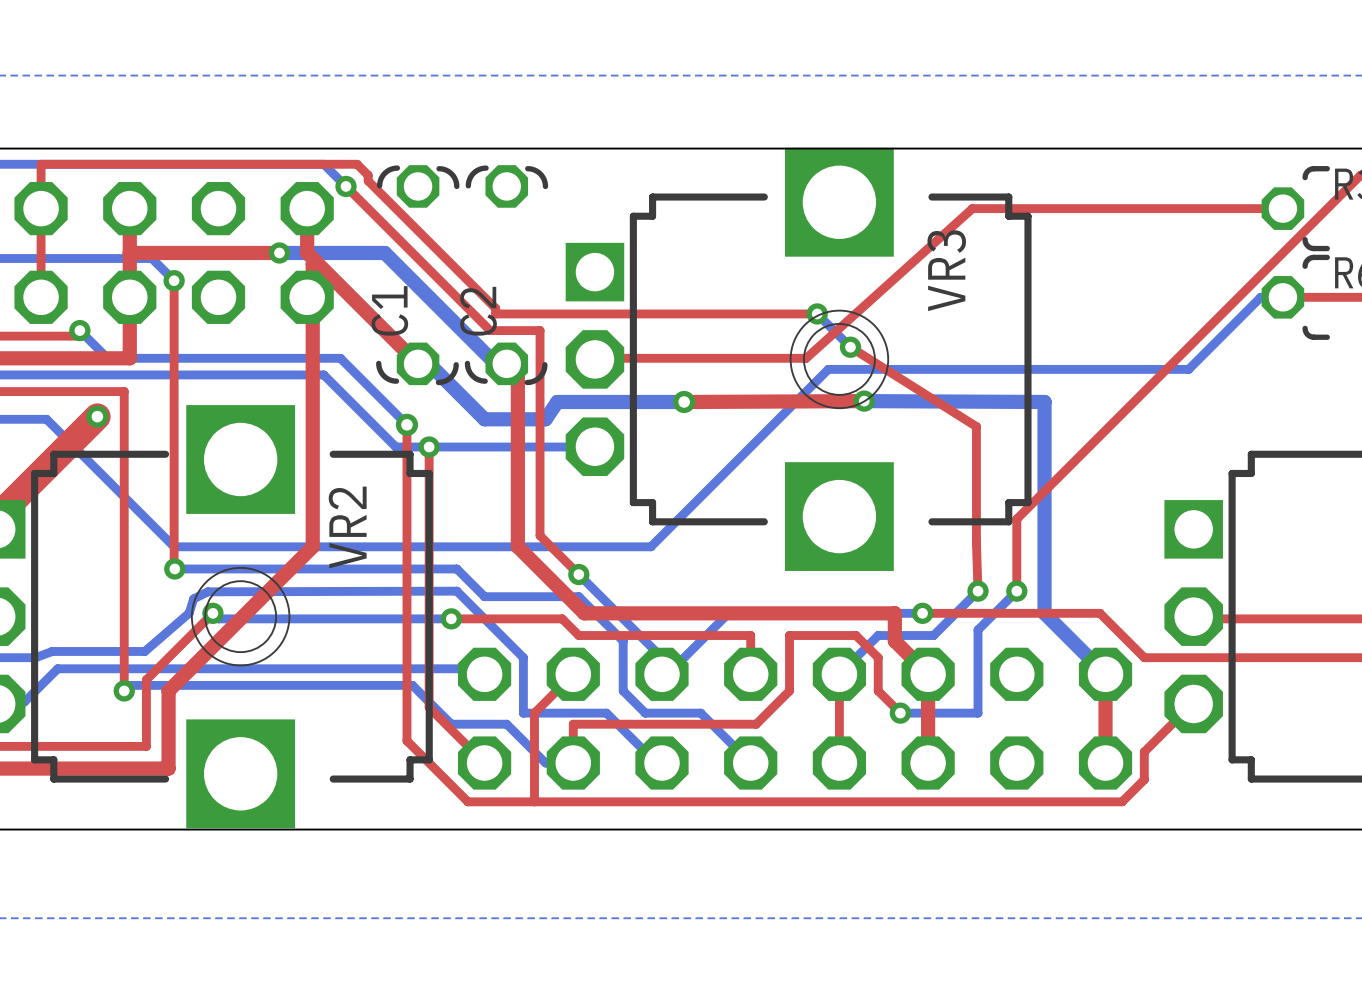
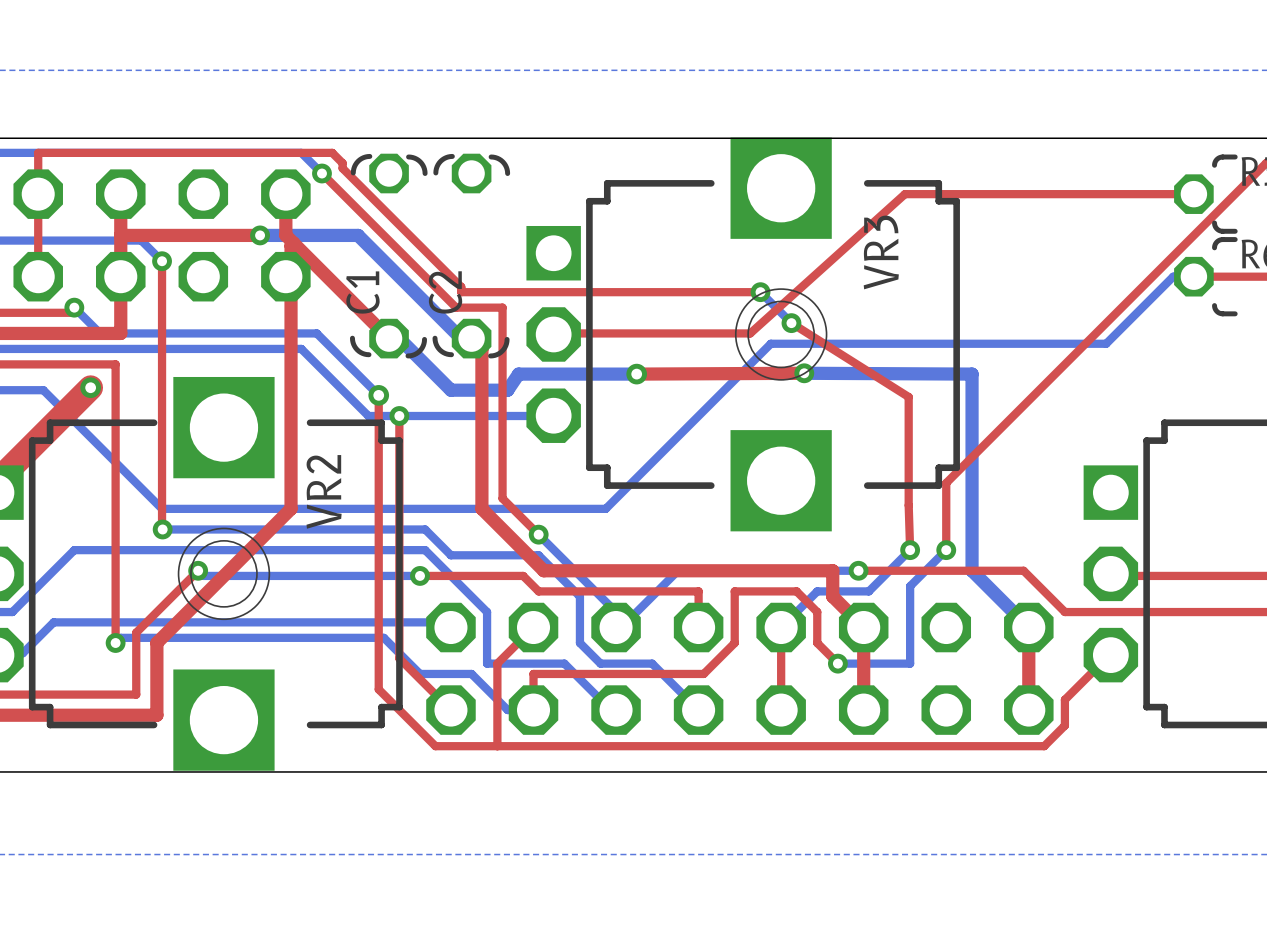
bottom track: (456, 591) (207, 591) (193, 598) (189, 613) (144, 651) (52, 651) (35, 657) (13, 657) -> (425, 550) (74, 550) (12, 612)

